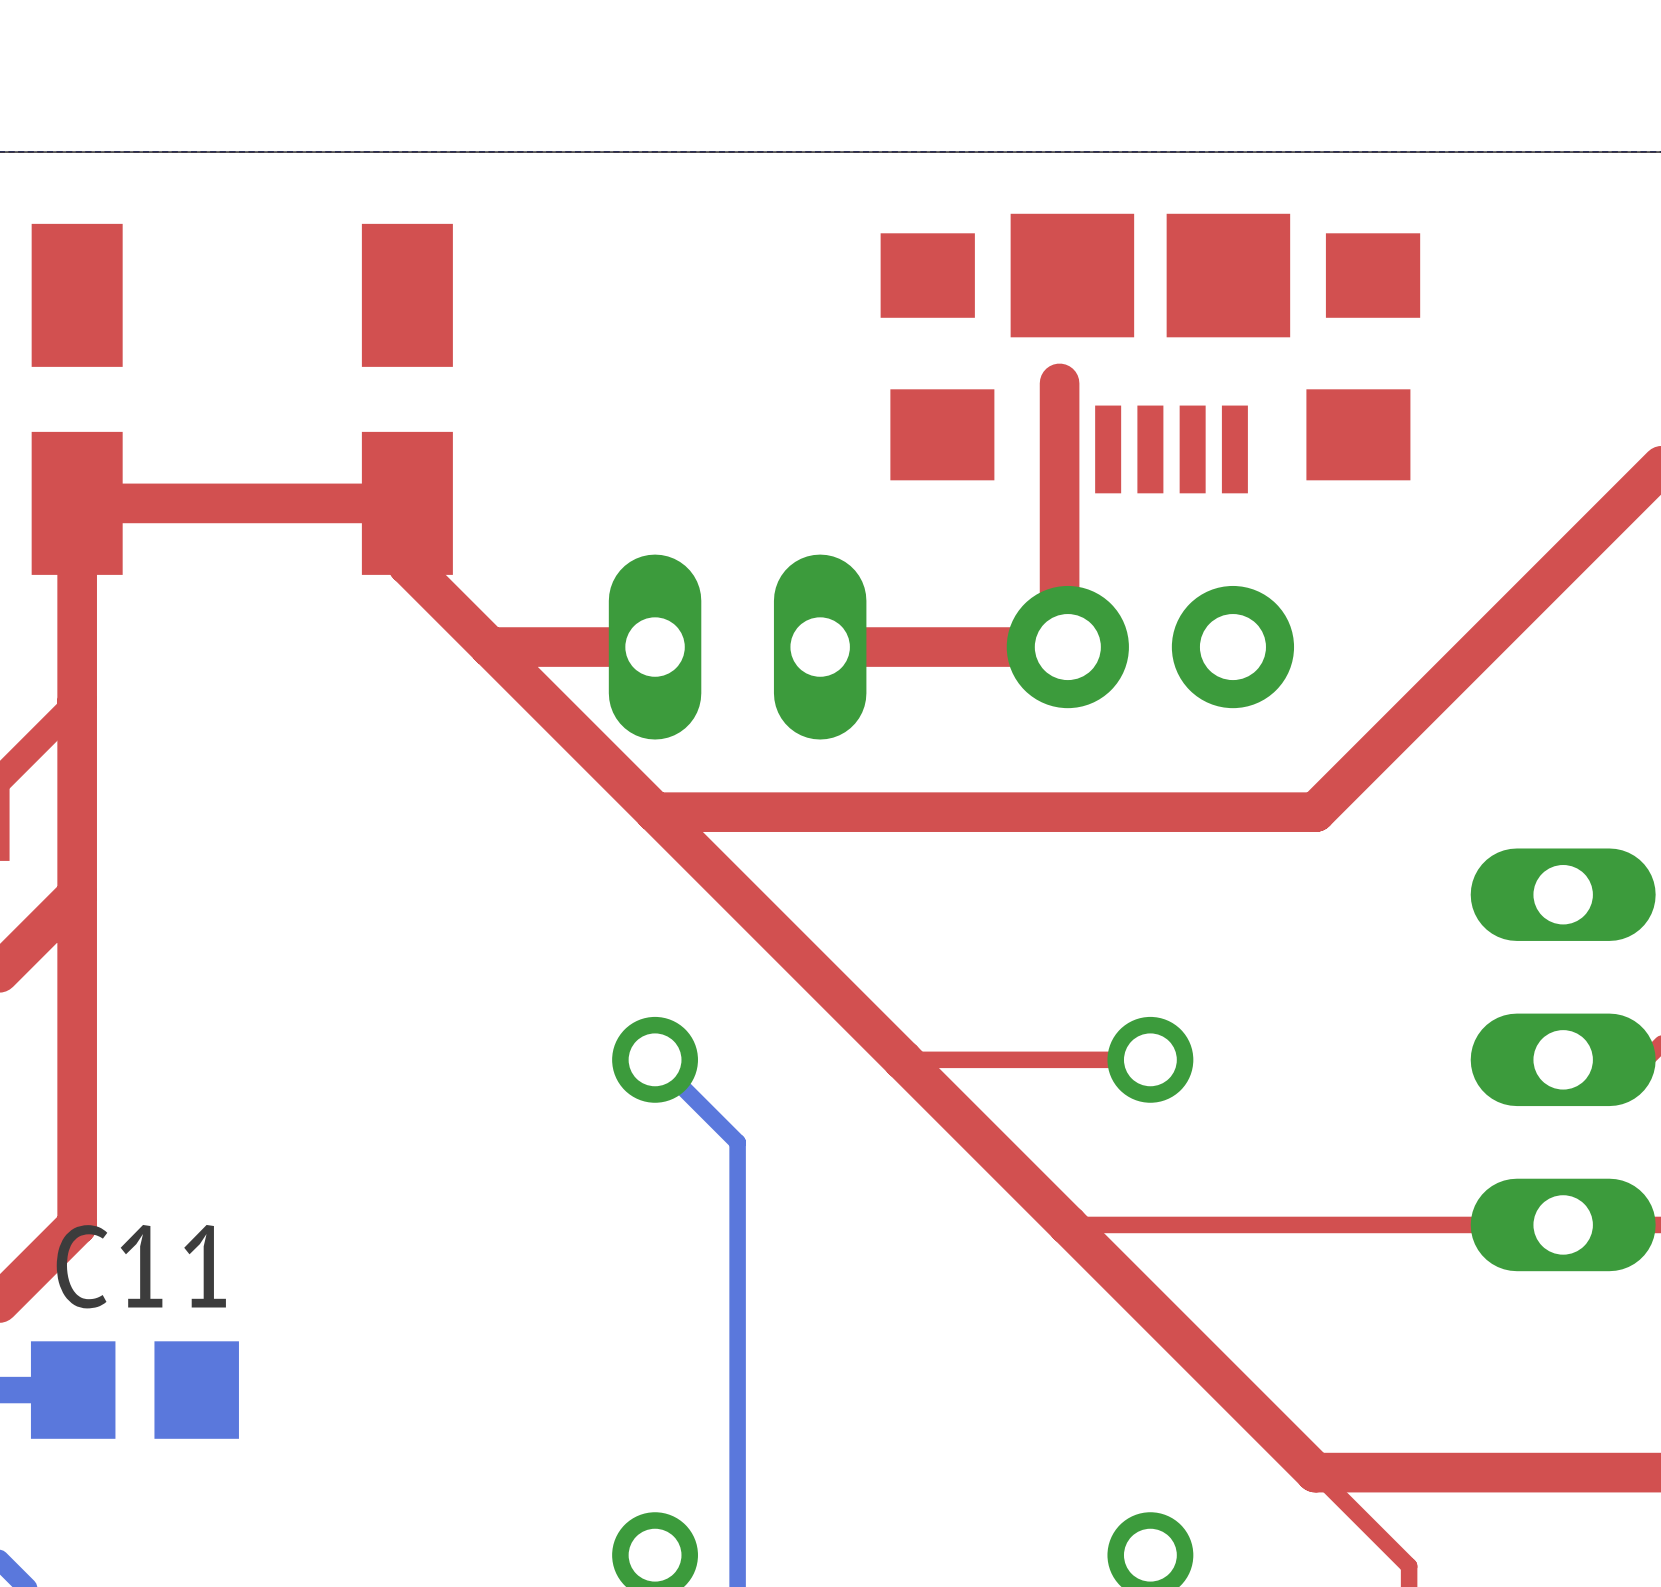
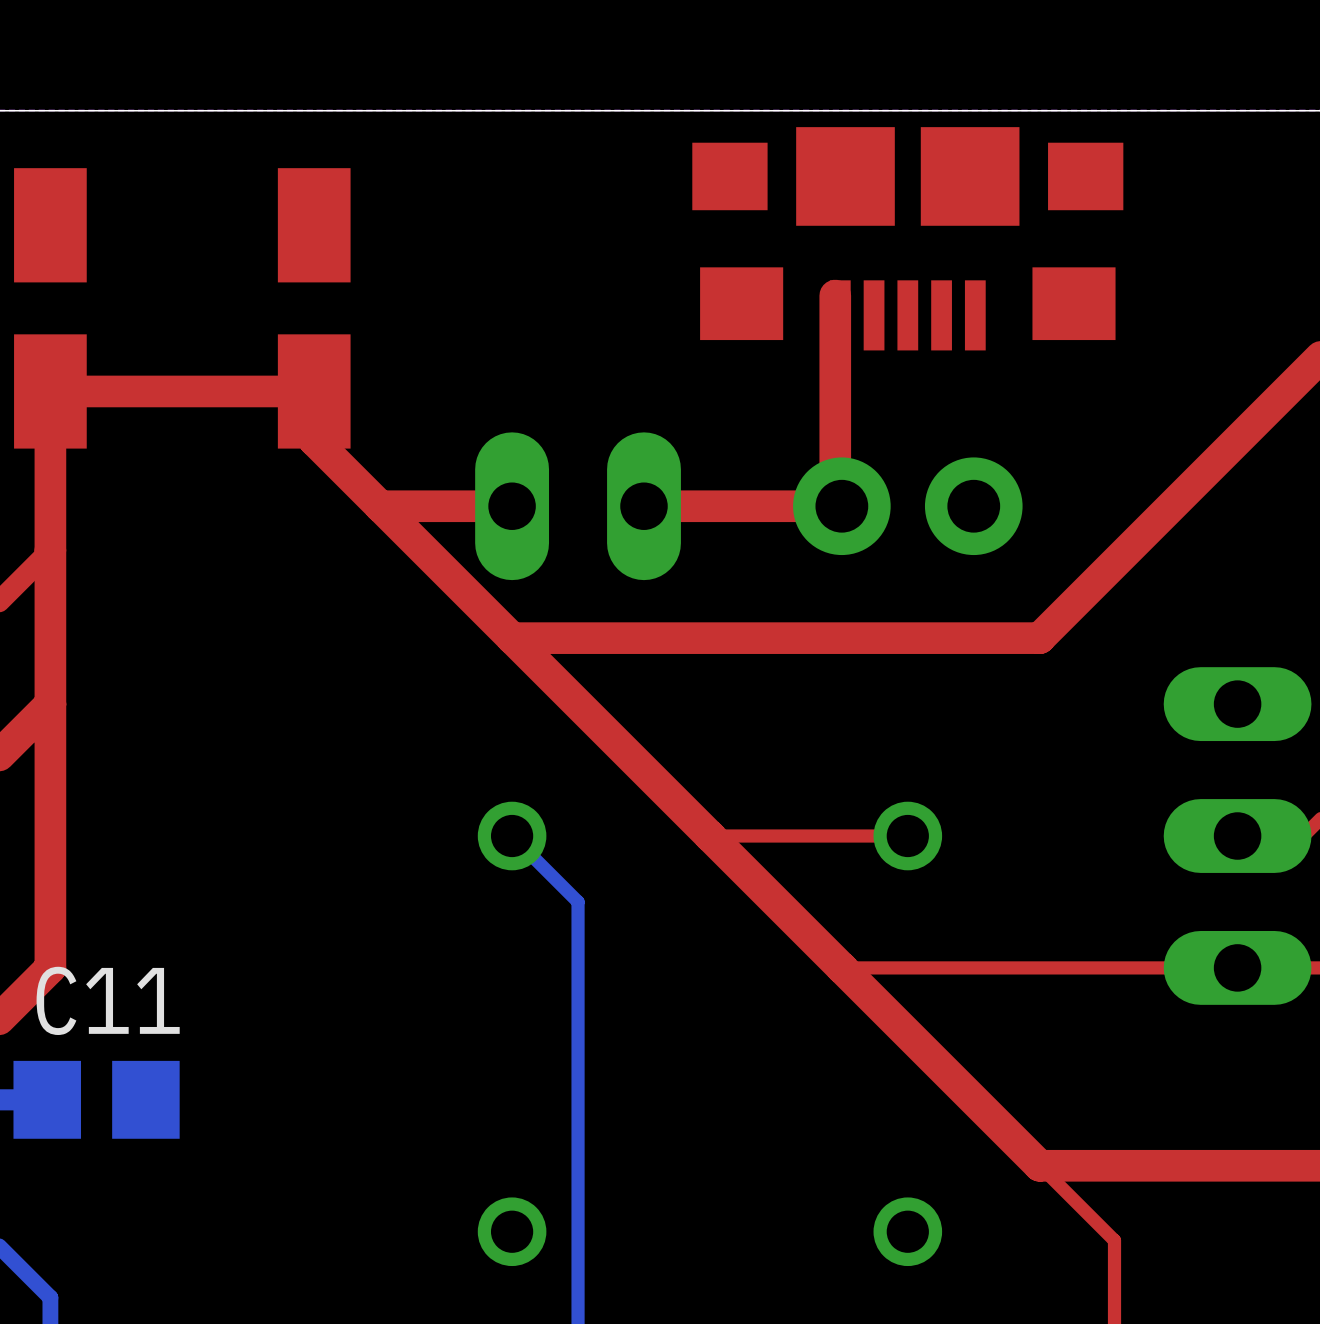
part position: (1150, 353) -> (907, 238)

